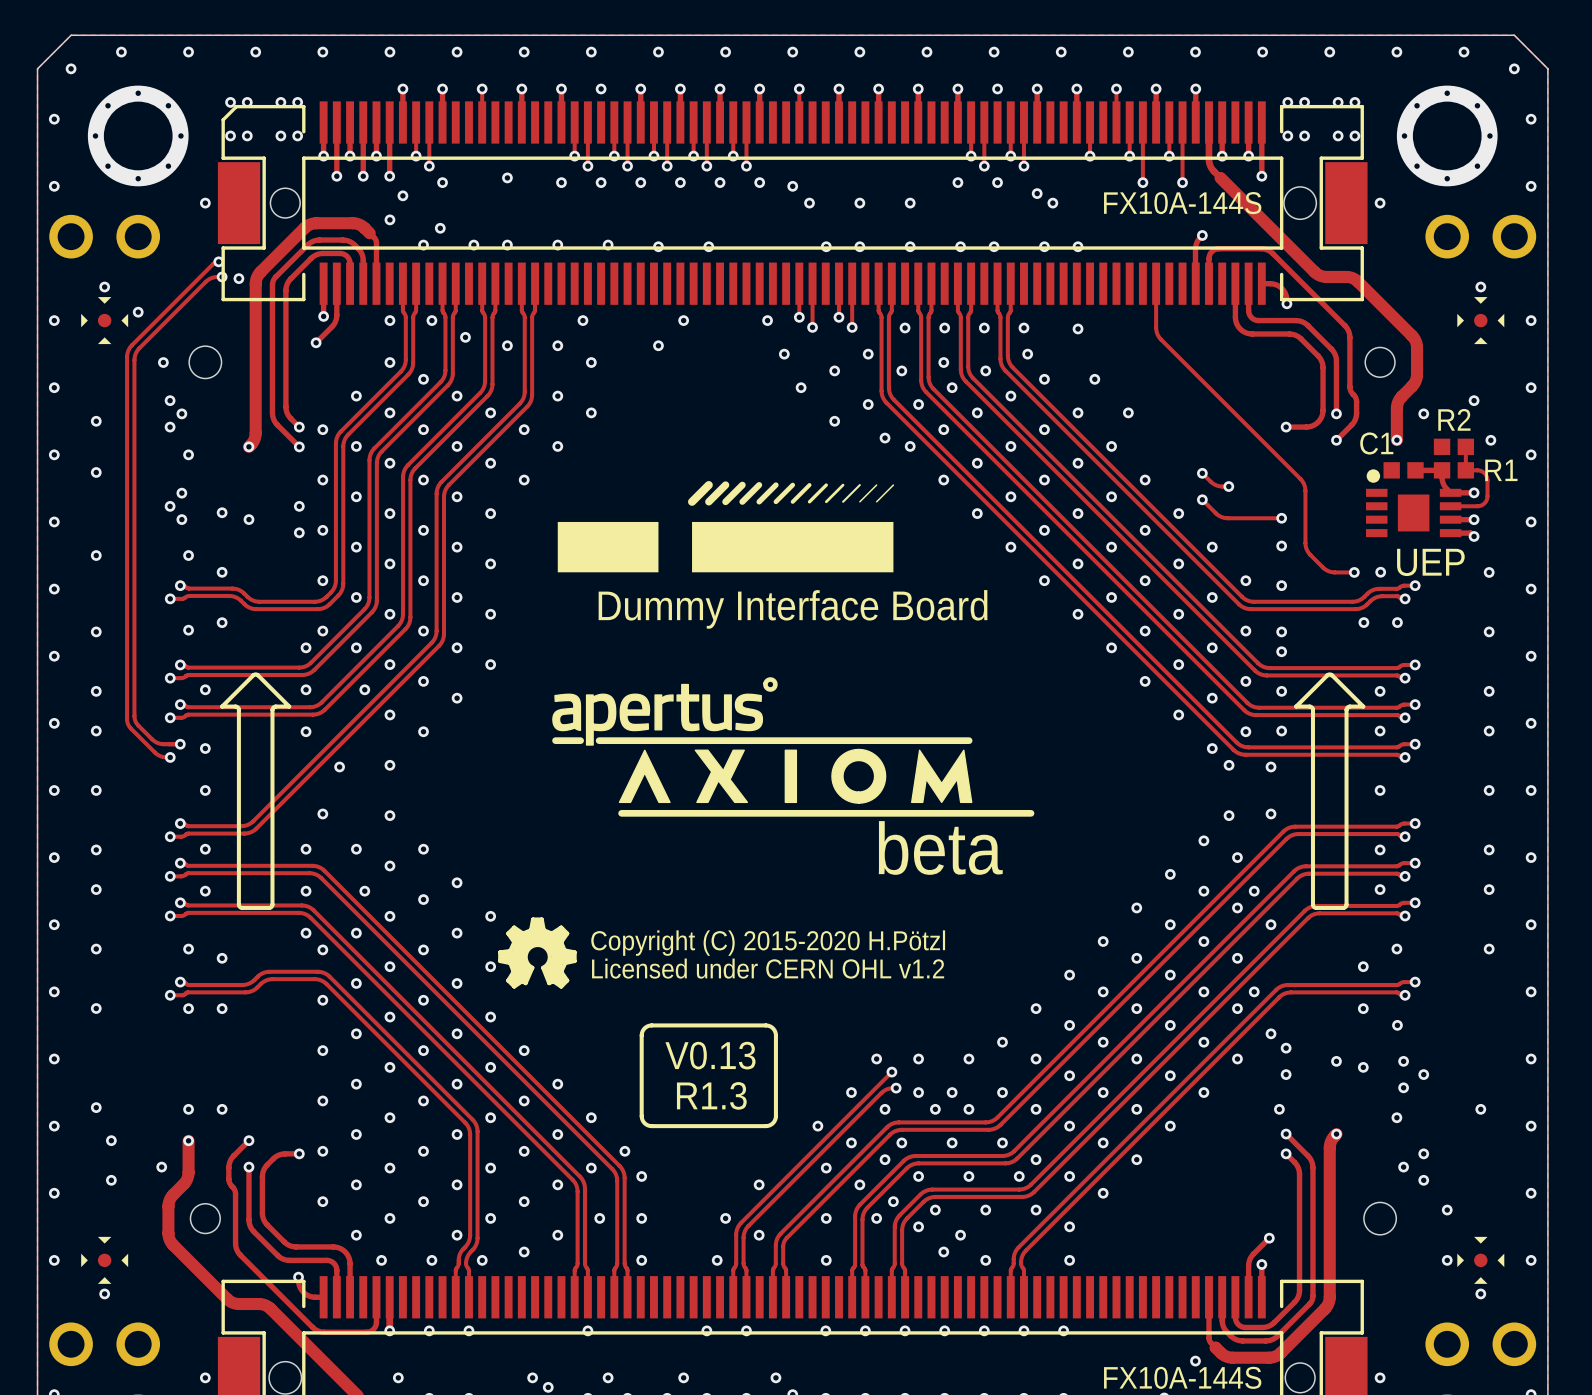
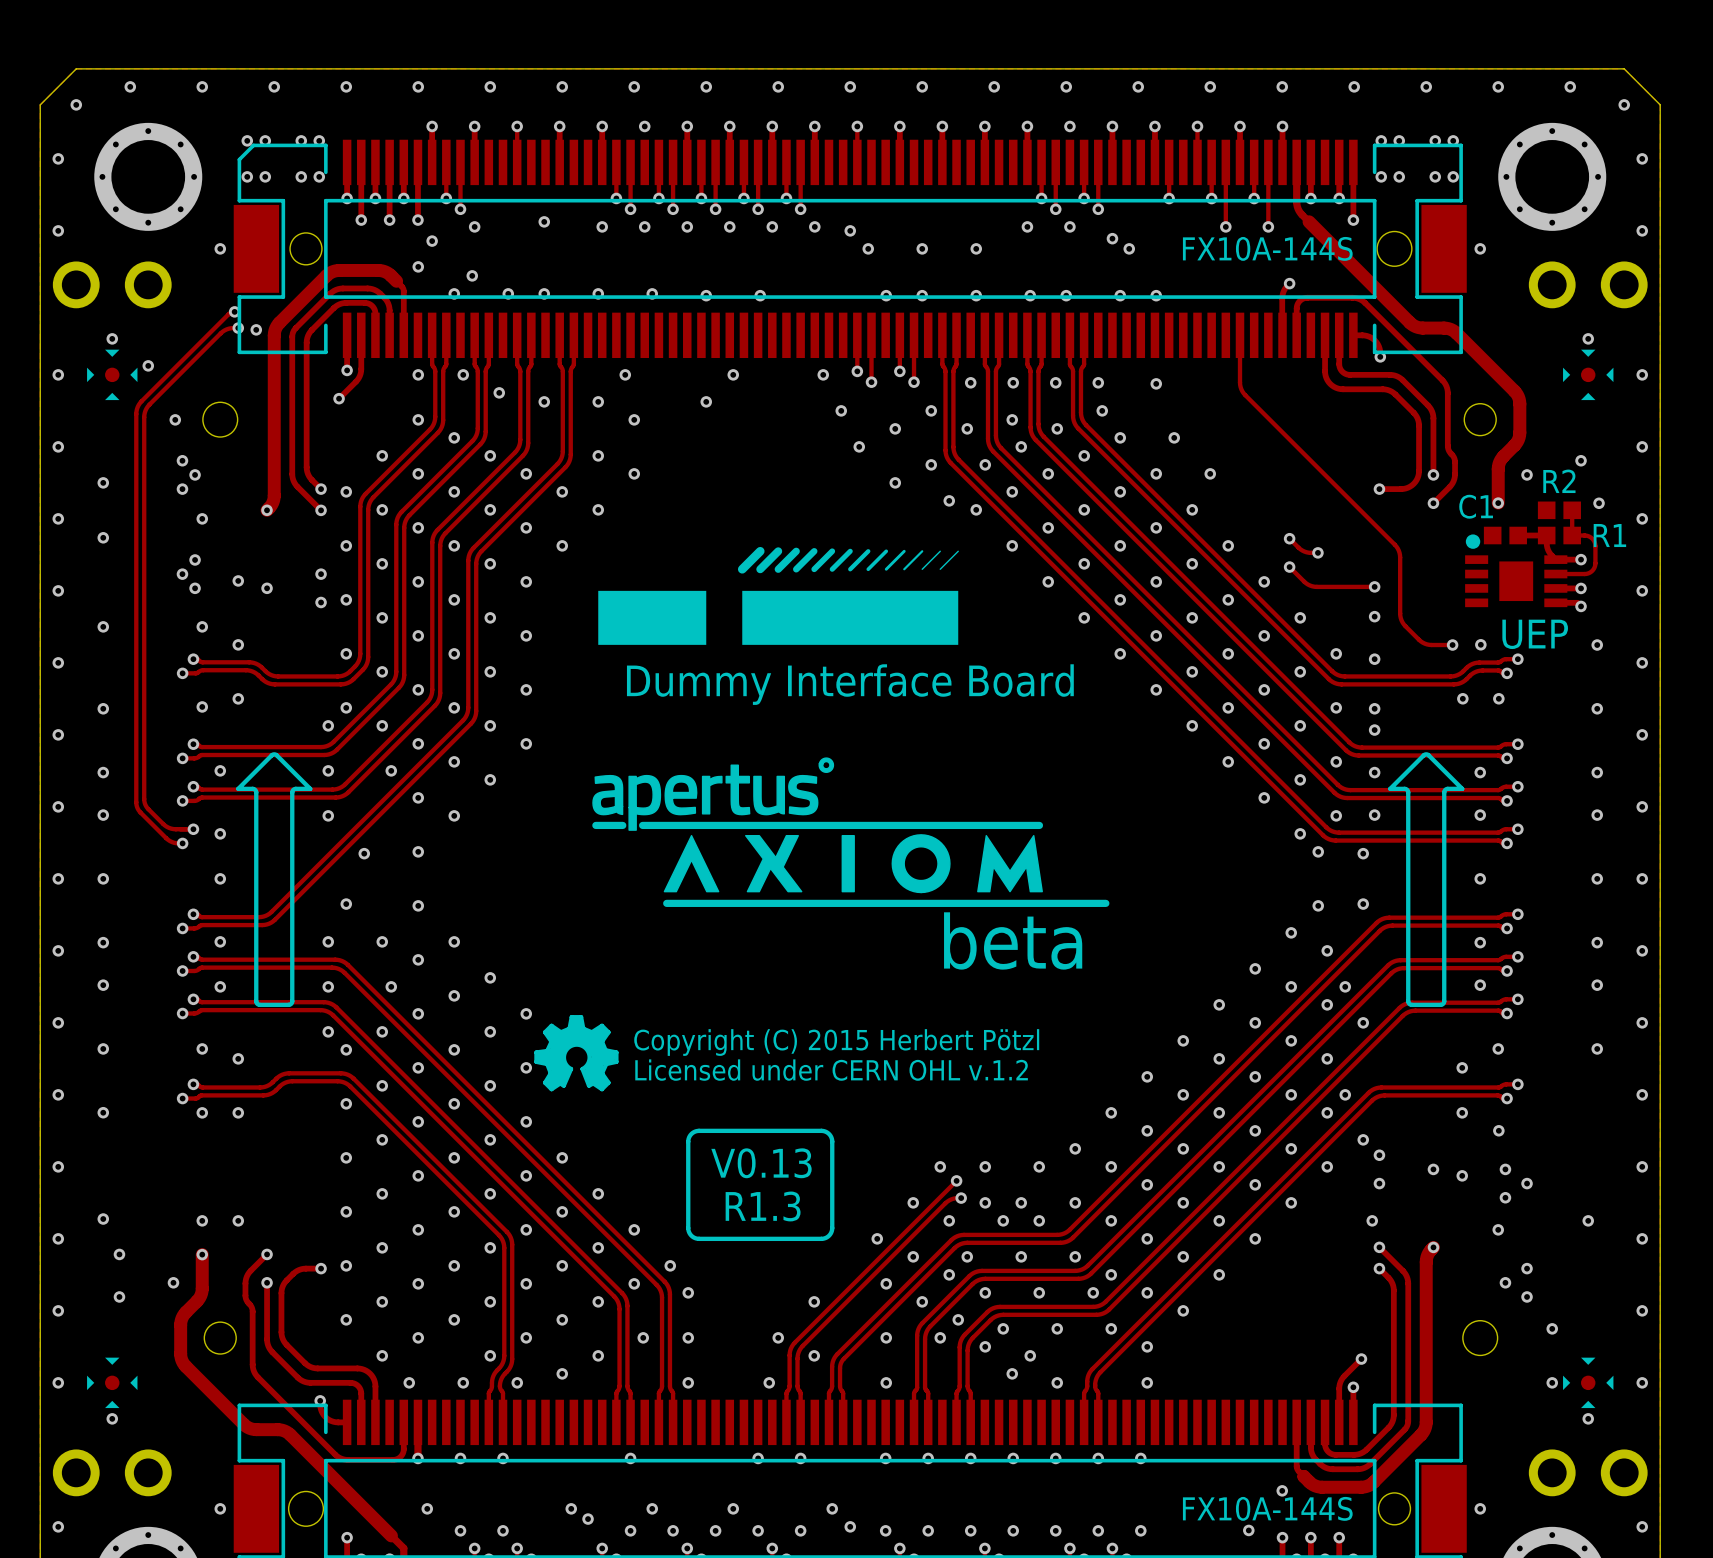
text: Copyright (C) 2015-2020 H.Pötzl (768, 943) -> Copyright (C) 2015 Herbert Pötzl (836, 1042)
text: Licensed under CERN OHL v1.2 (768, 968) -> Licensed under CERN OHL v.1.2 (831, 1070)

